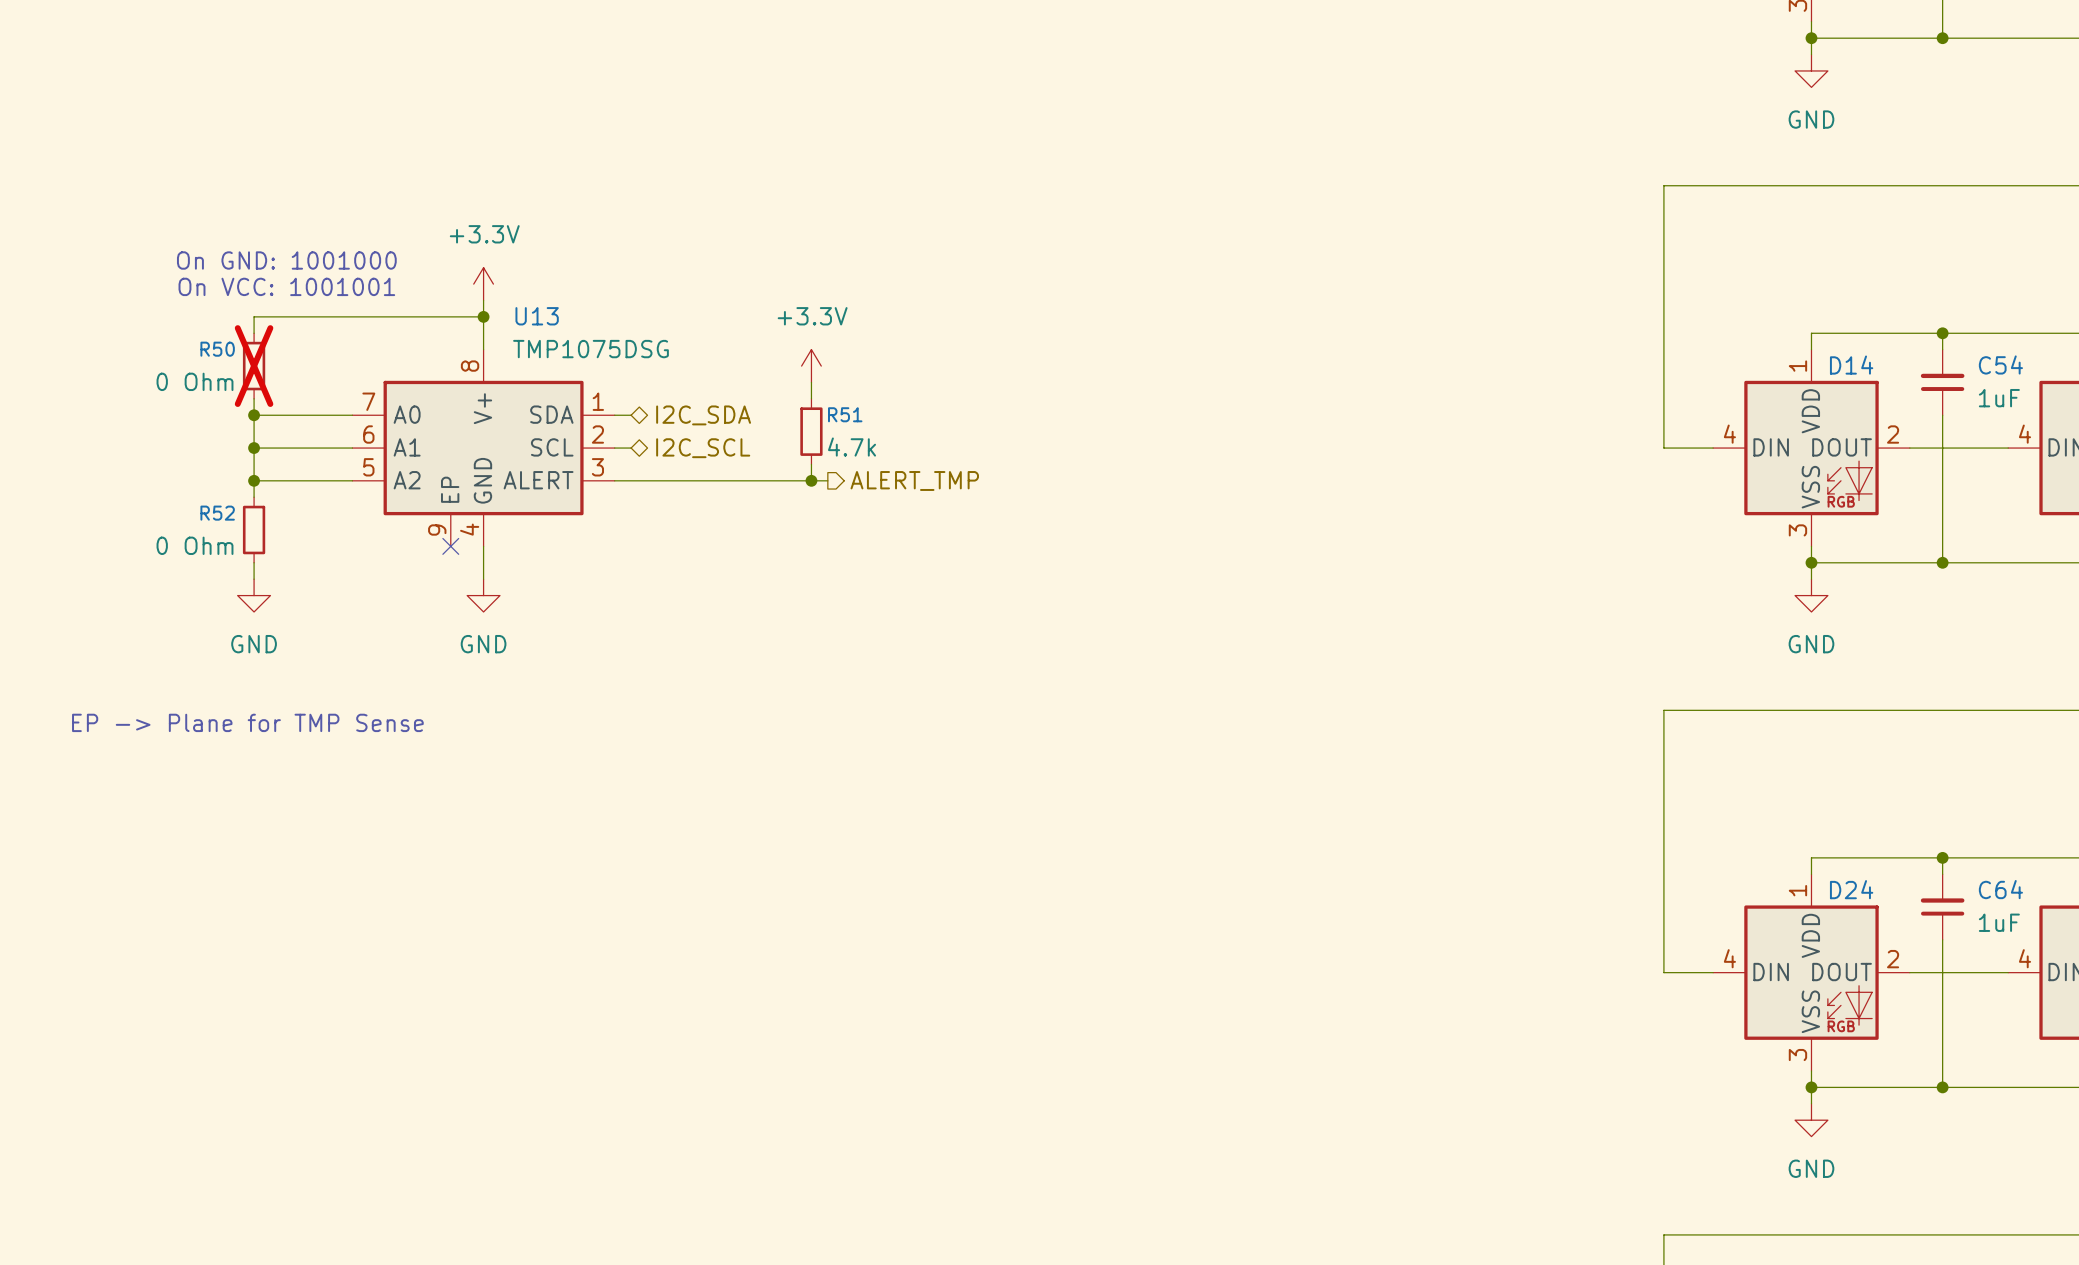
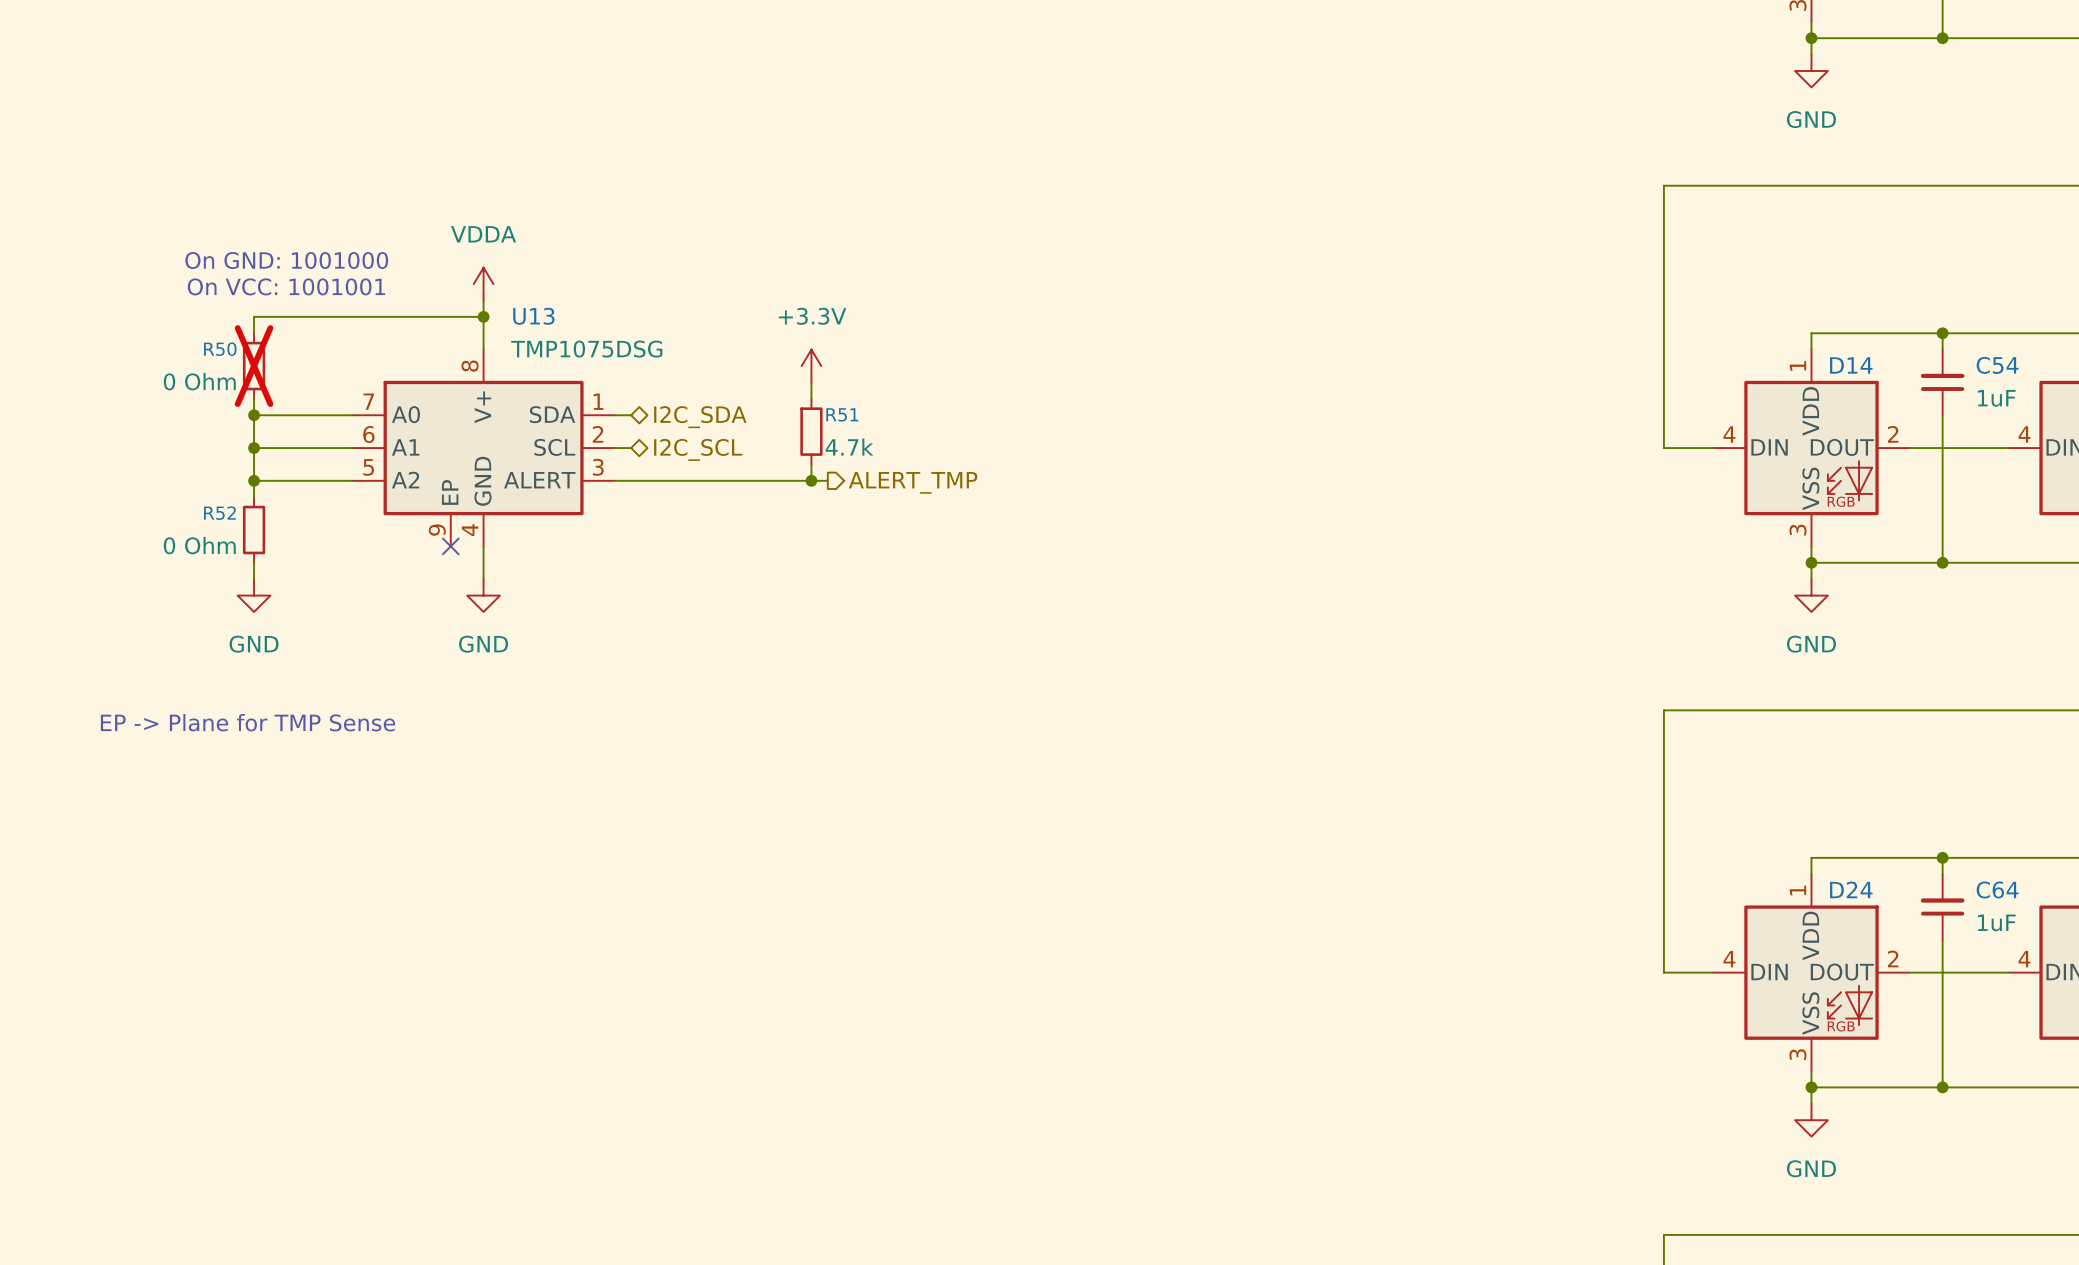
power symbol: +3.3V (483, 284) -> VDDA (483, 284)

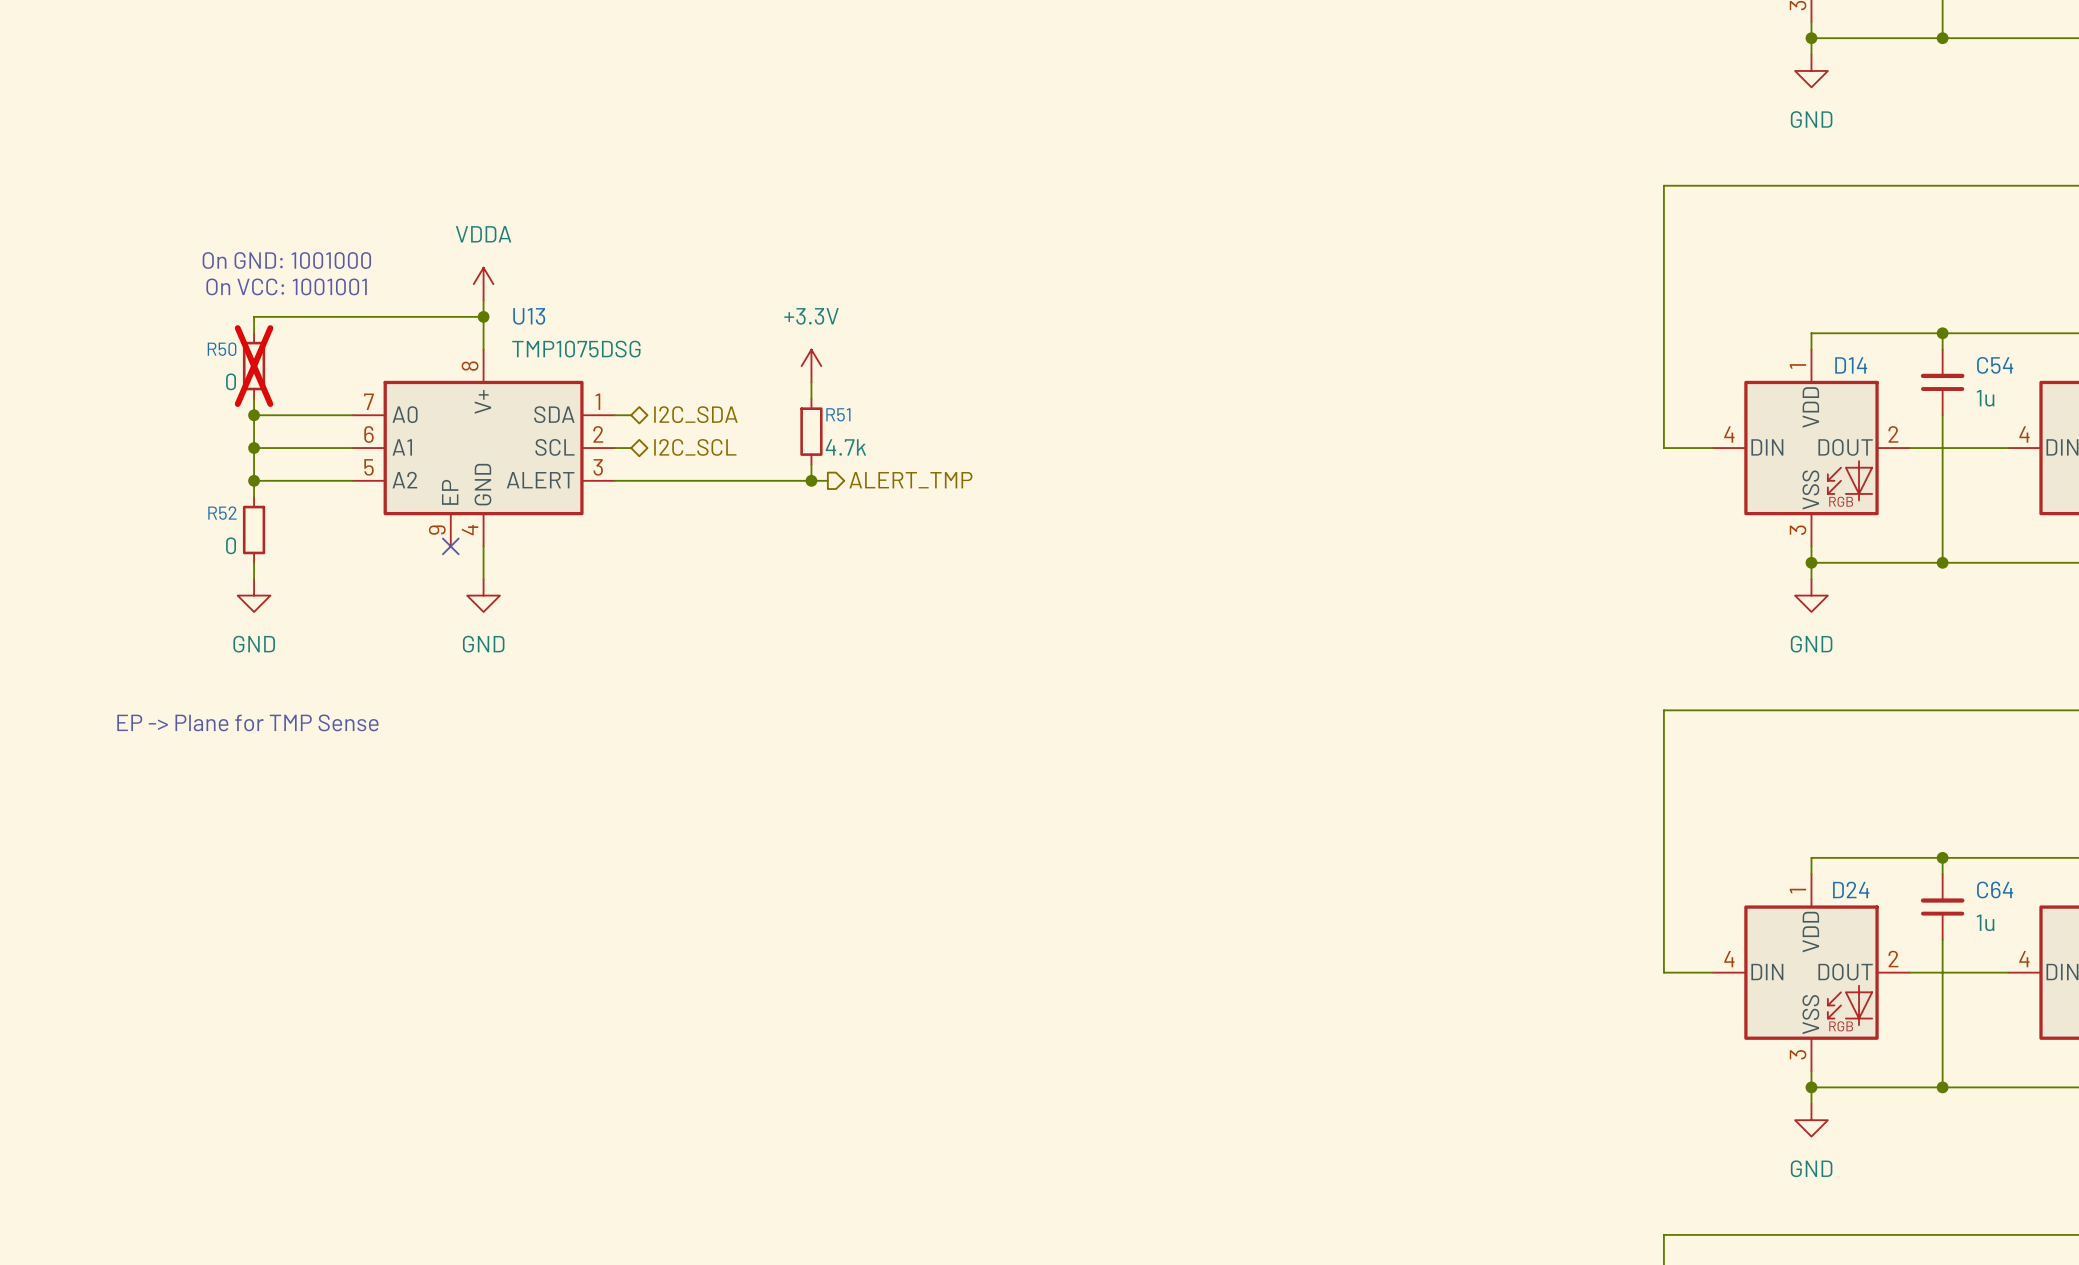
R50 value: 0 Ohm (199, 381) -> 0 (231, 381)
C54 value: 1uF (1996, 398) -> 1u (1985, 398)
R52 value: 0 Ohm (199, 545) -> 0 (231, 545)
C64 value: 1uF (1996, 922) -> 1u (1985, 922)

